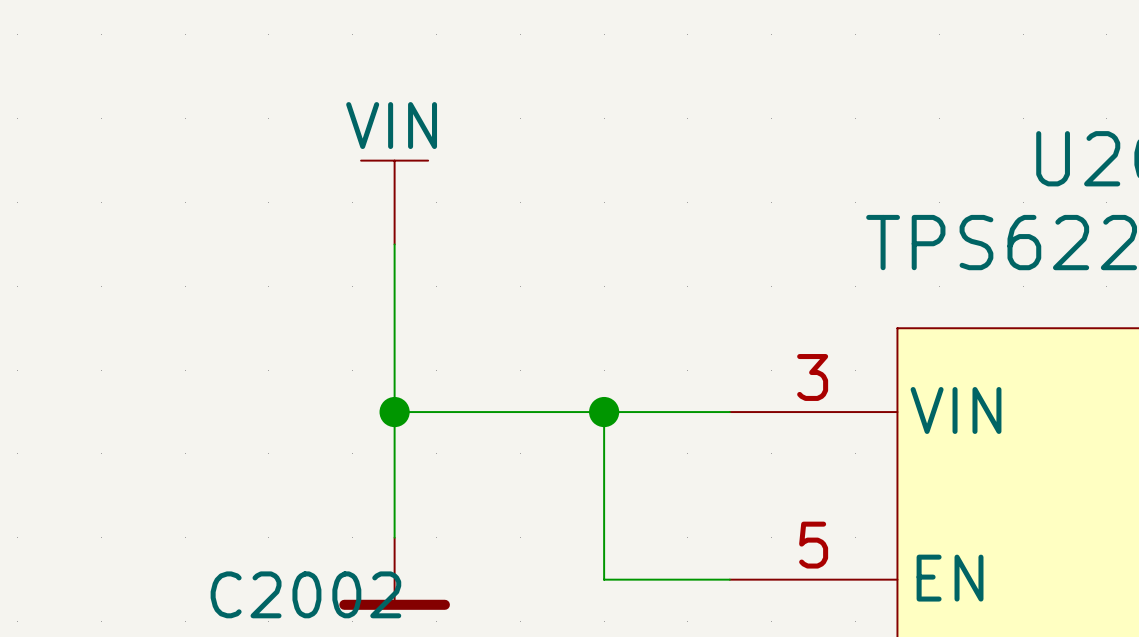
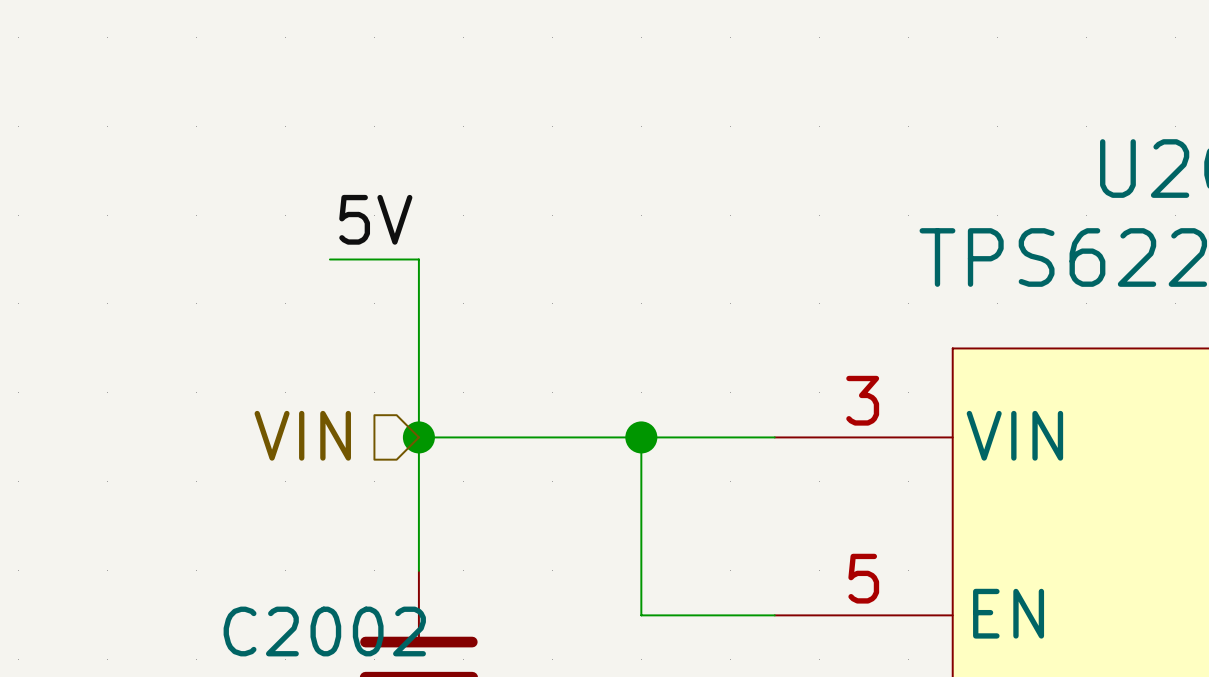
power symbol: VIN (394, 202) -> none
label: none -> 5V (375, 219)
wire: none -> (329, 259) (418, 259)
hierarchical label: none -> VIN (302, 435)

